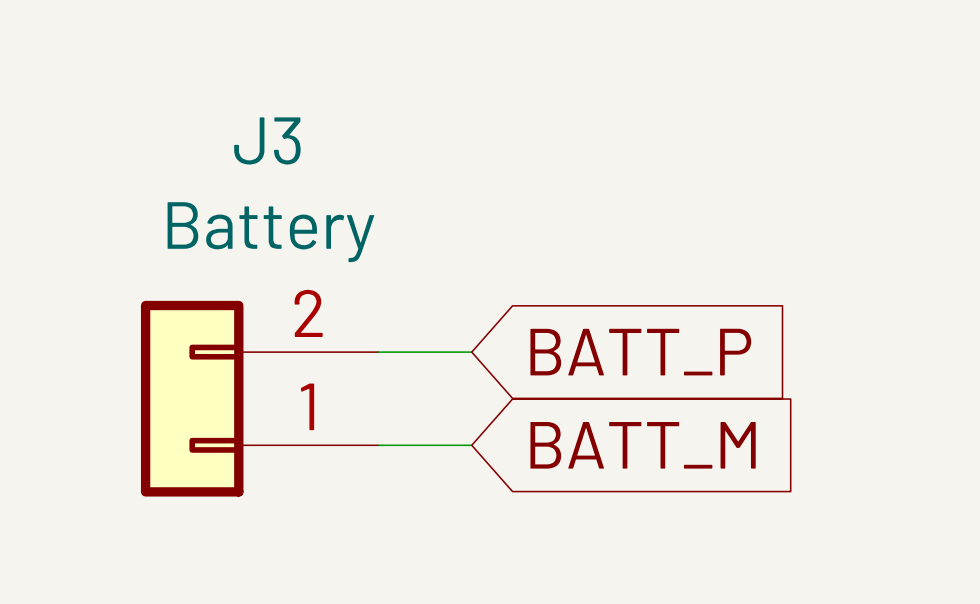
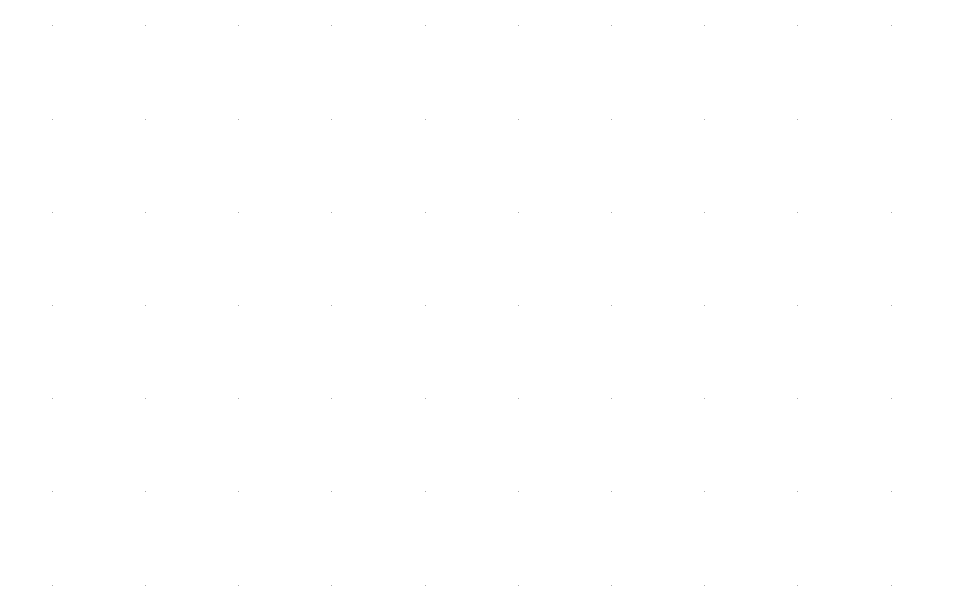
wire: (378, 352) (471, 352) -> none
global label: BATT_P (640, 352) -> none
J3: Battery (259, 398) -> none
wire: (378, 445) (471, 445) -> none
global label: BATT_M (643, 445) -> none

